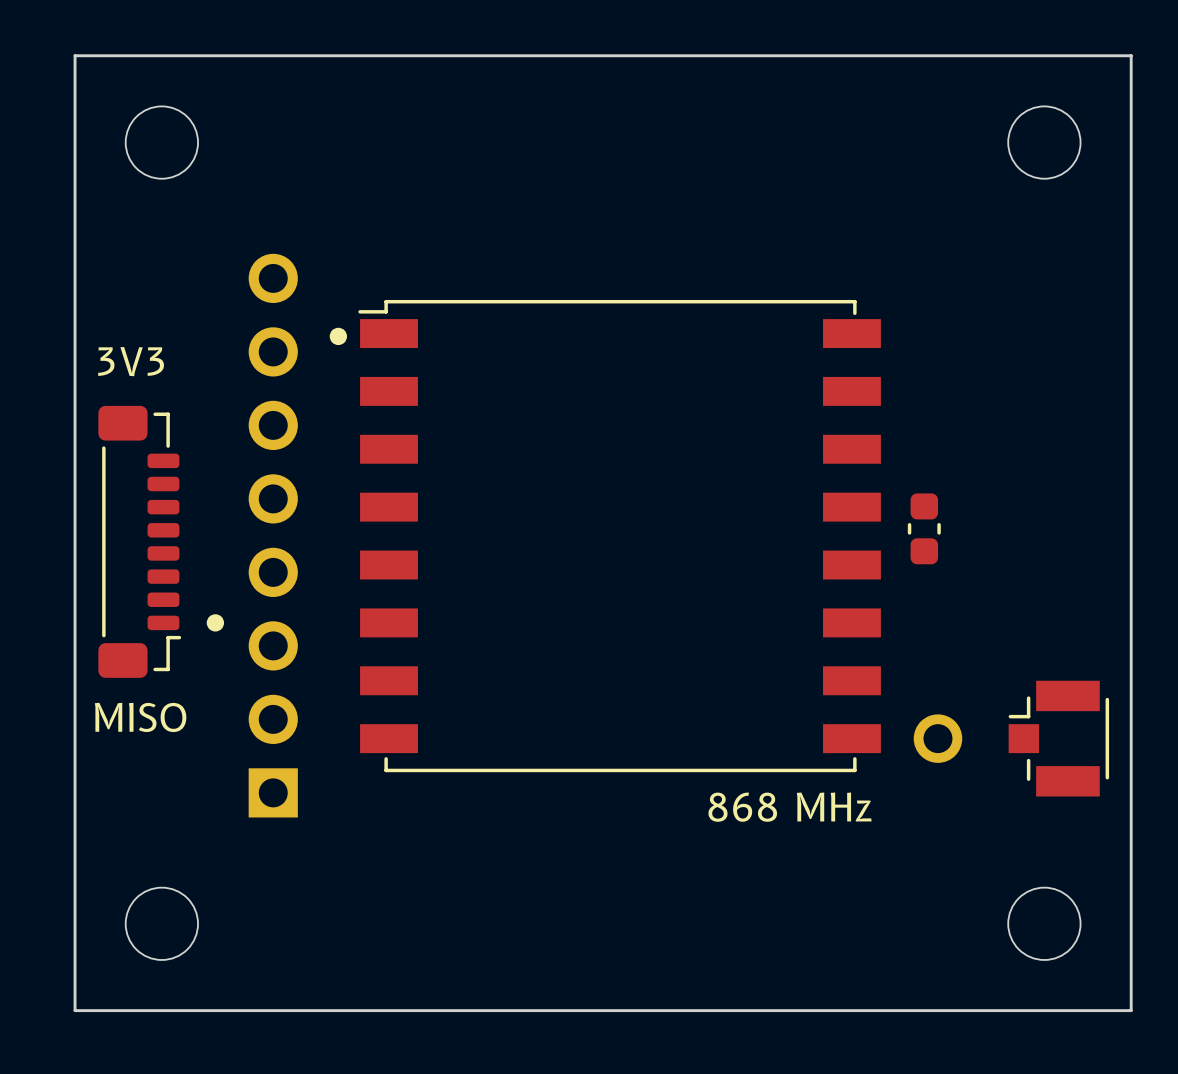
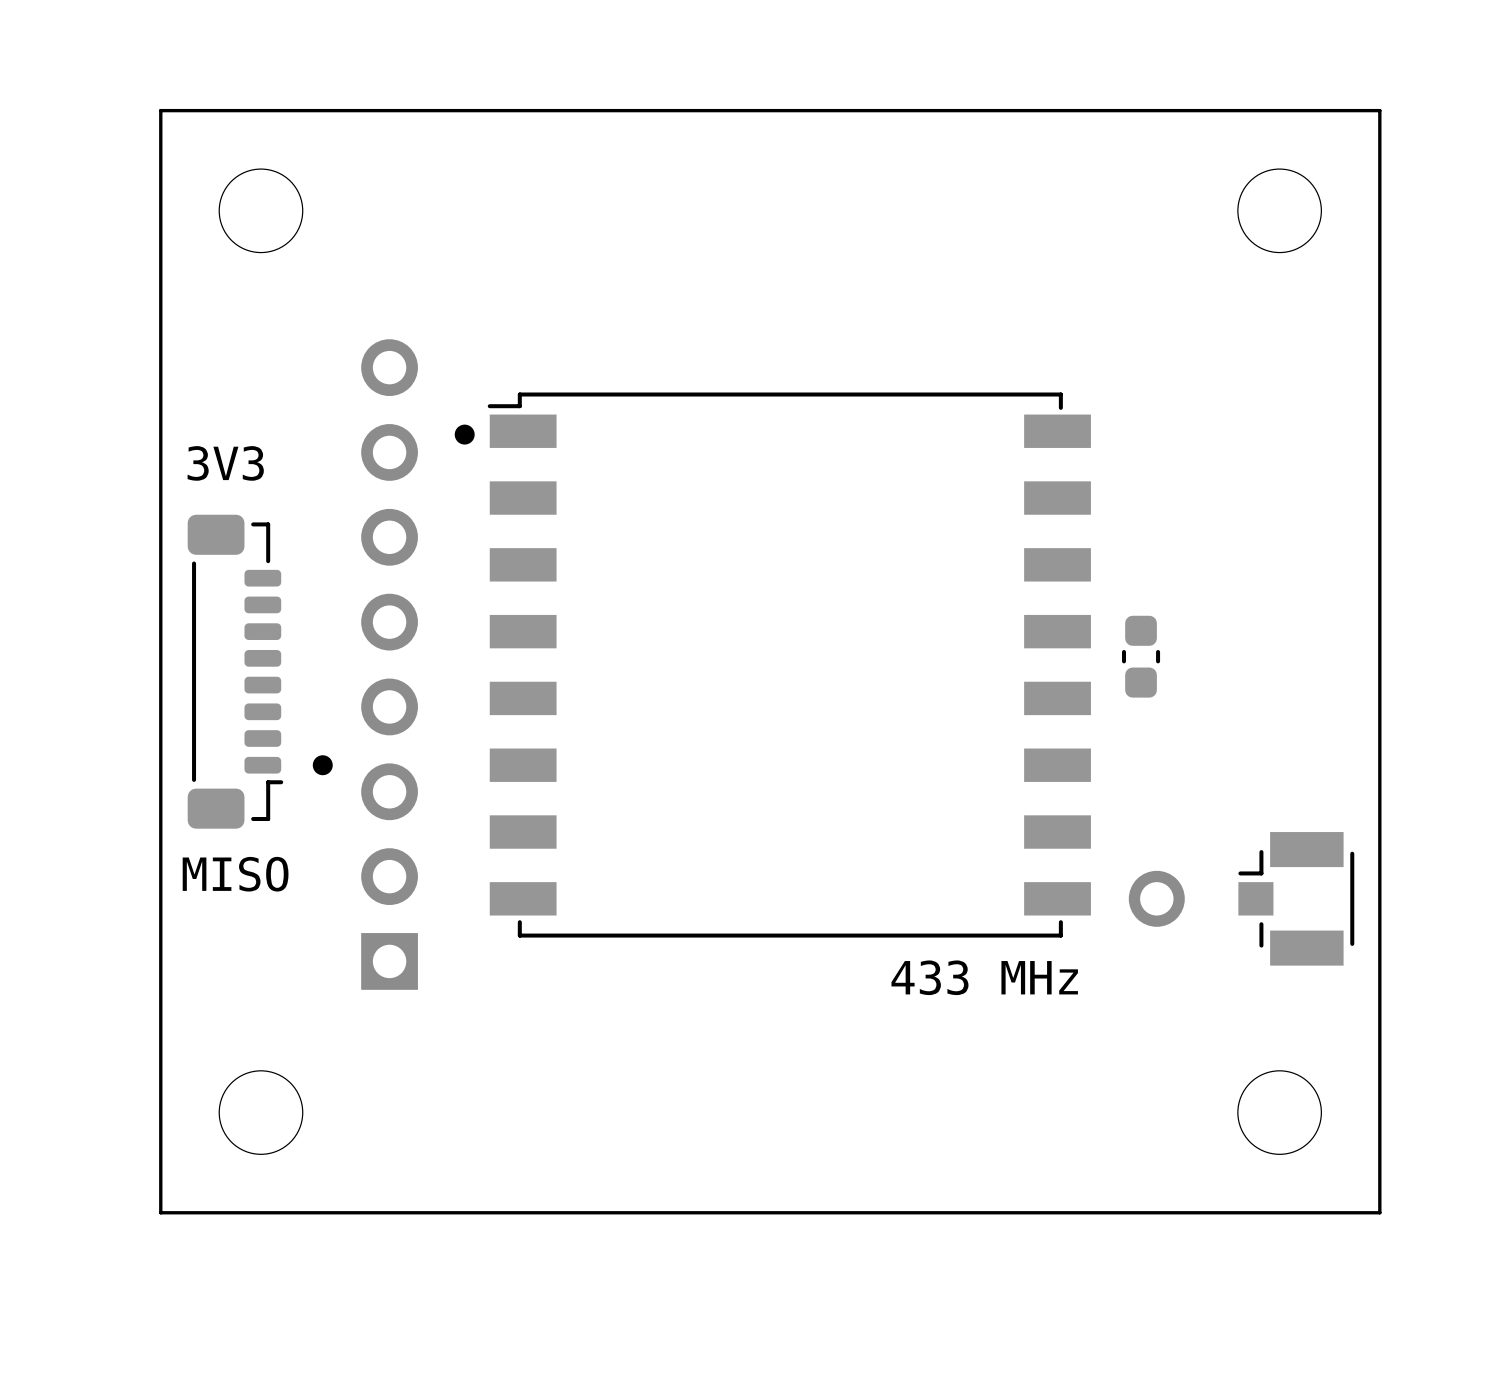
text: 868 MHz (790, 807) -> 433 MHz (984, 977)

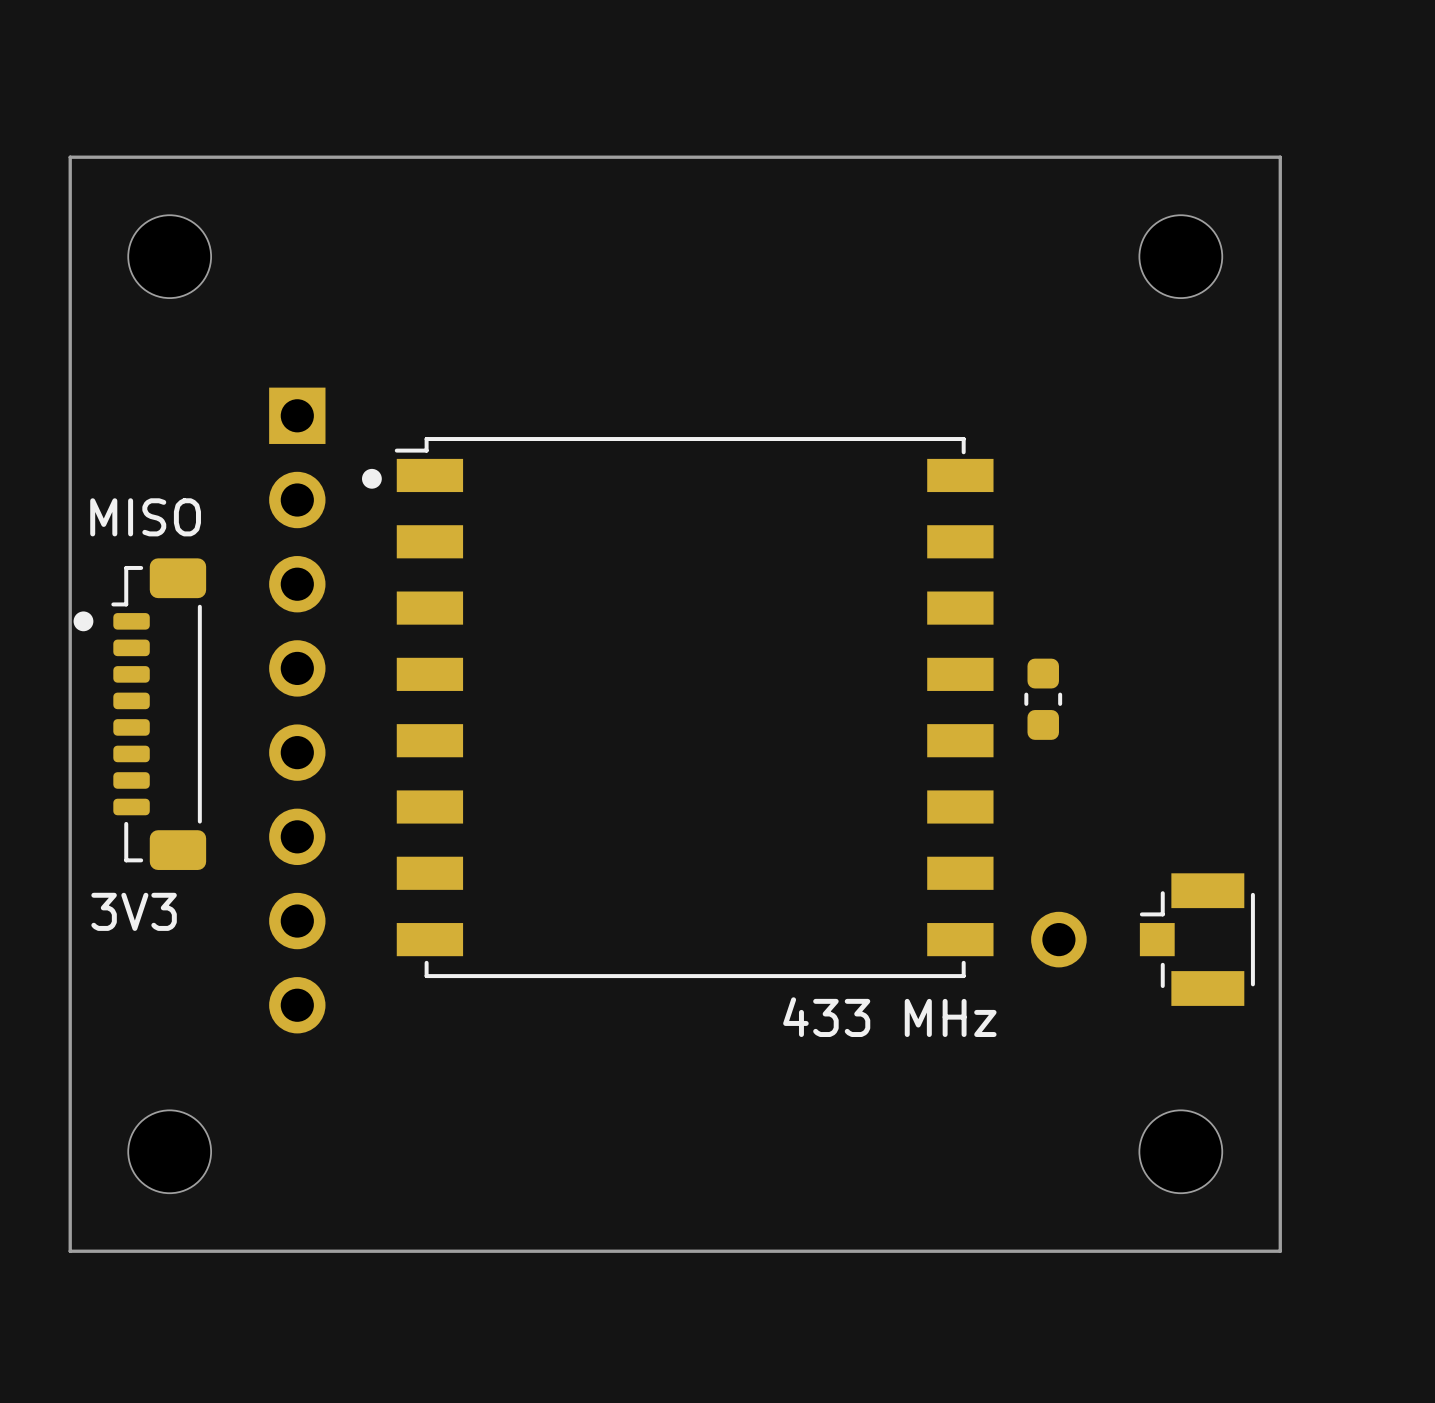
text: 3V3 (225, 463) -> MISO (145, 517)
part rotation: 0° (389, 664) -> 180° (297, 710)
part rotation: 0° (235, 671) -> 180° (158, 714)
drawing position: (322, 765) -> (83, 621)
text: MISO (235, 874) -> 3V3 (134, 911)

